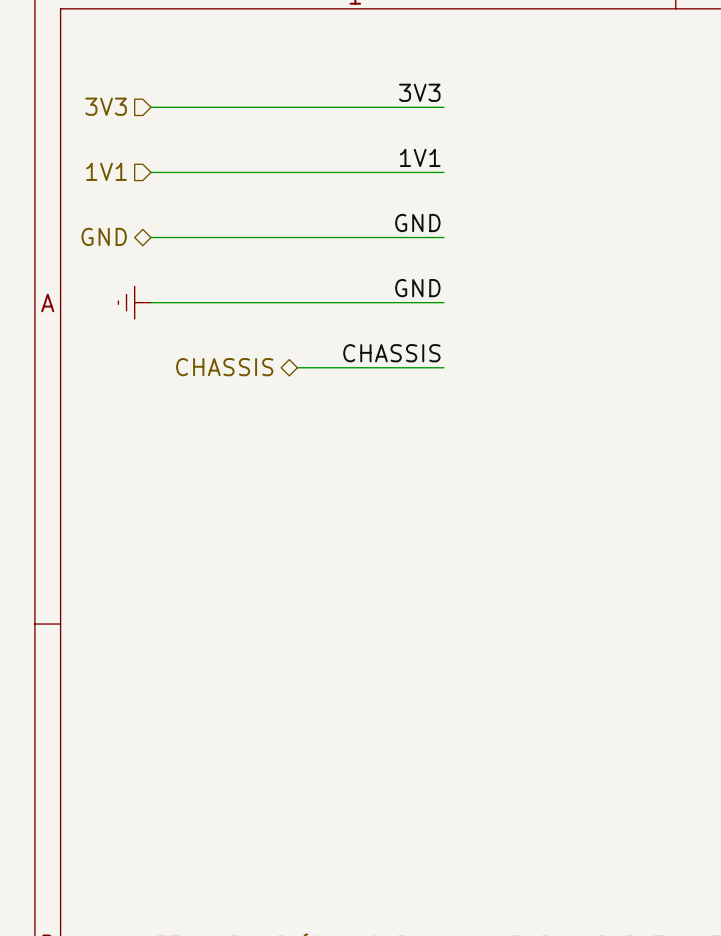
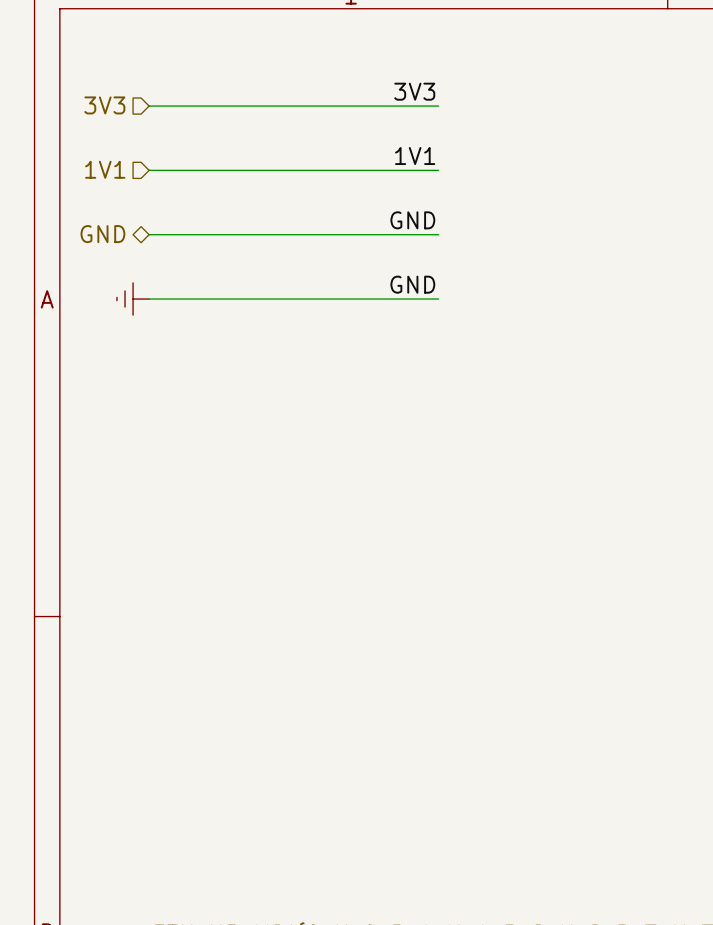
label: CHASSIS (391, 353) -> none
hierarchical label: CHASSIS (224, 367) -> none
wire: (297, 367) (443, 367) -> none

